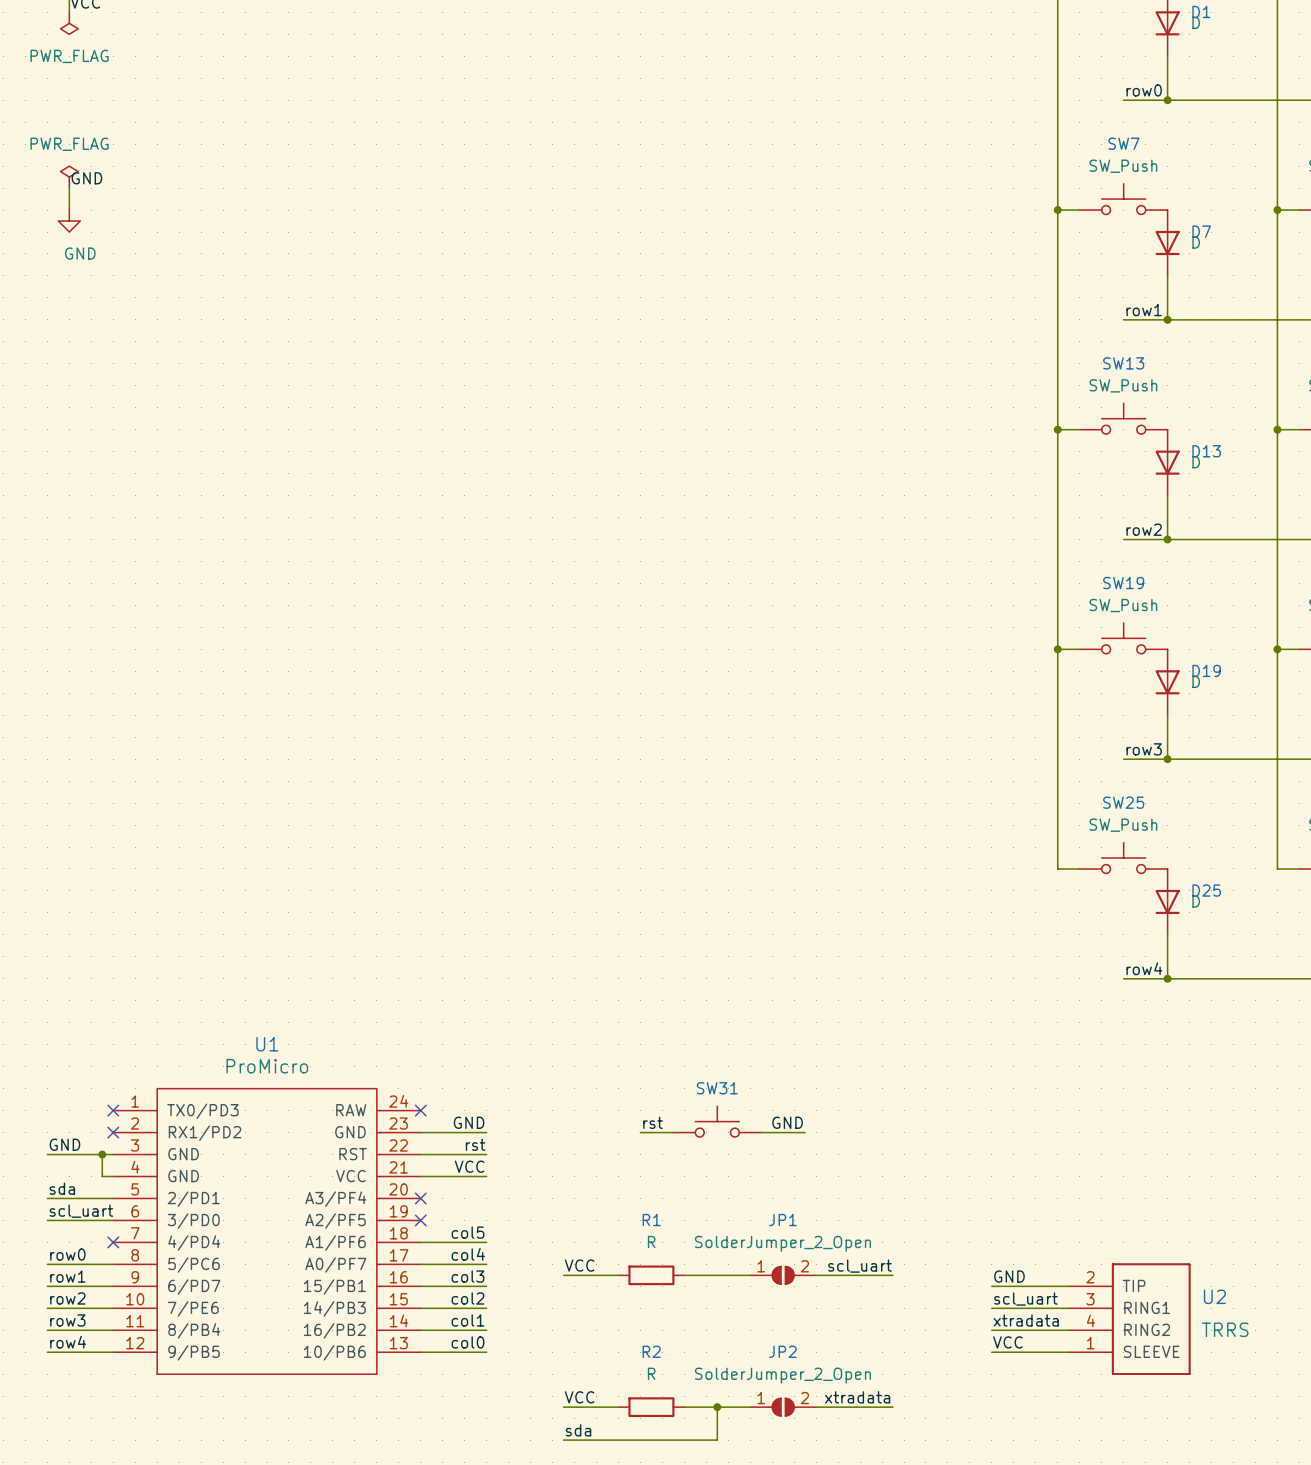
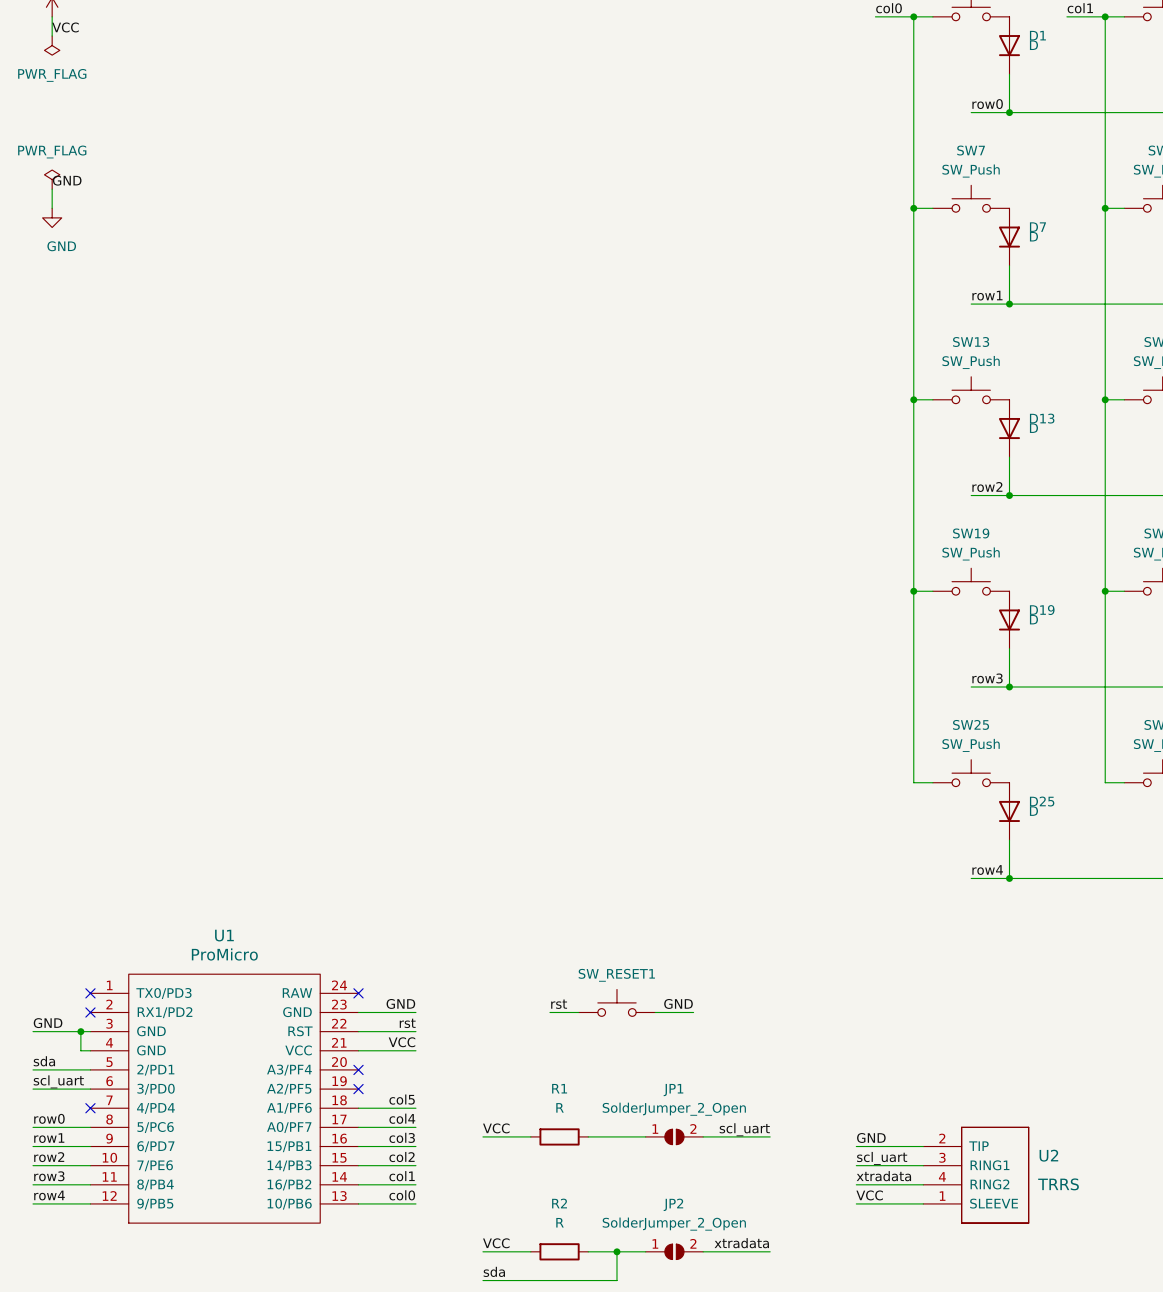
SW31 name: SW31 (717, 1088) -> SW_RESET1 (616, 975)

